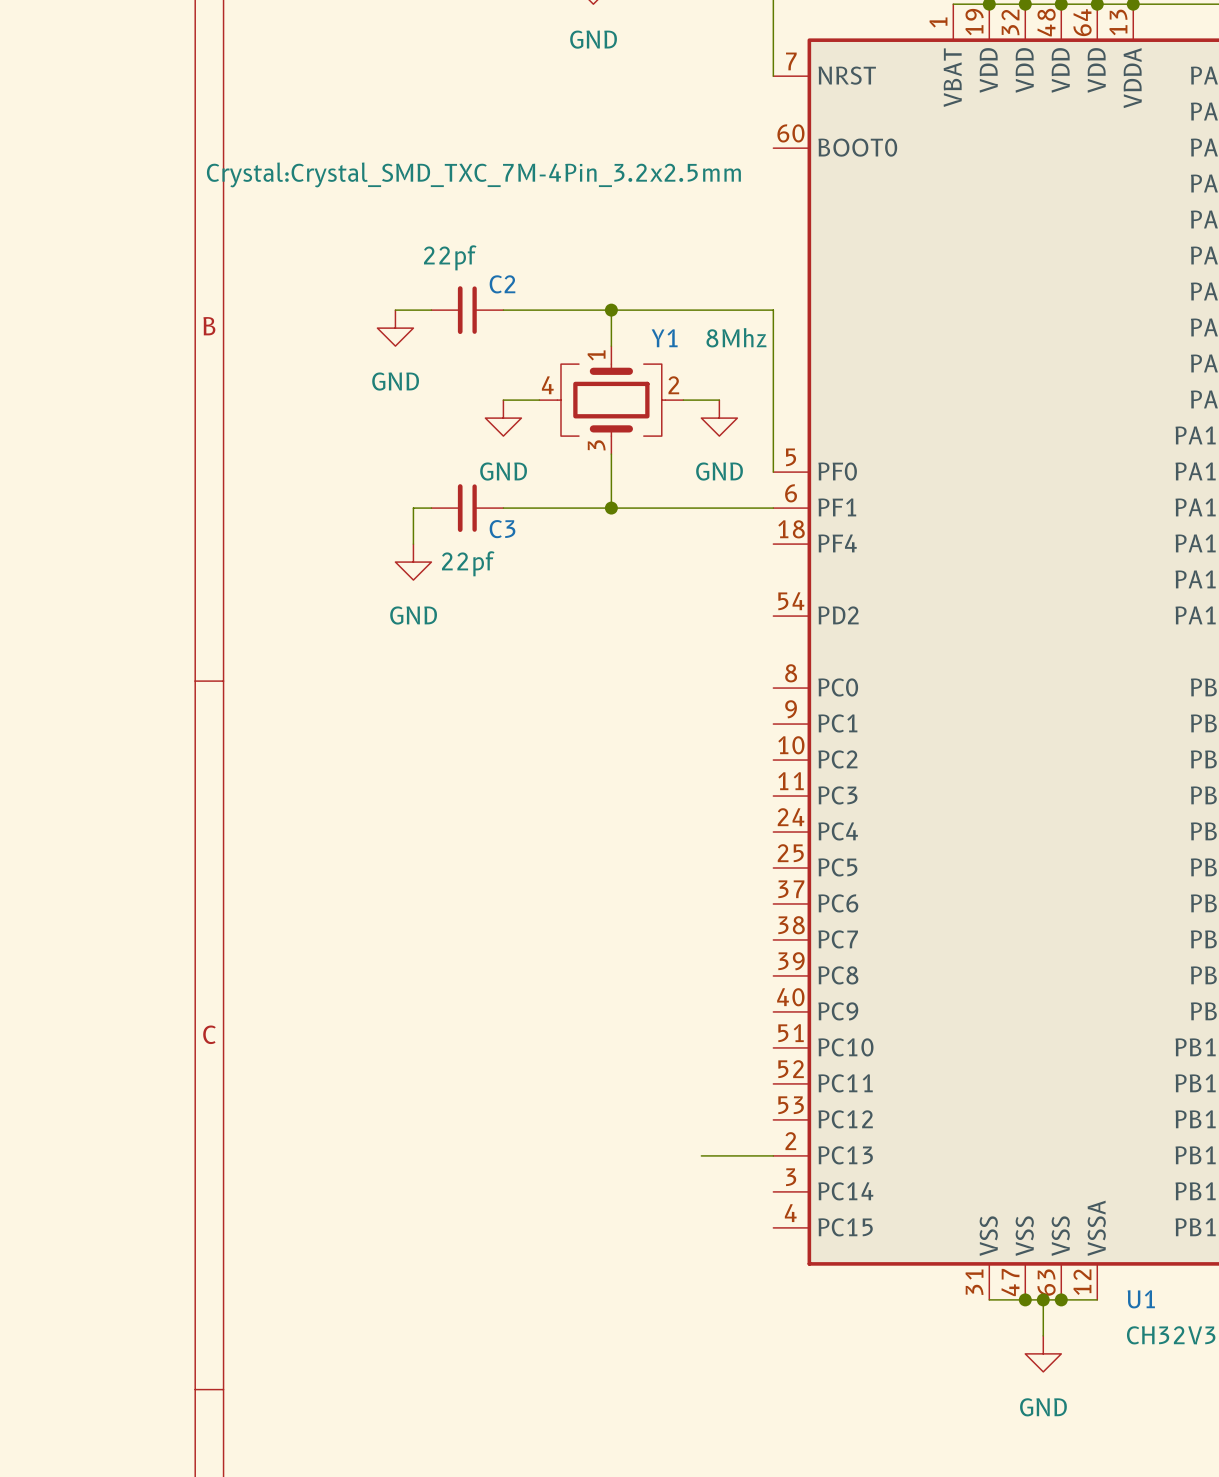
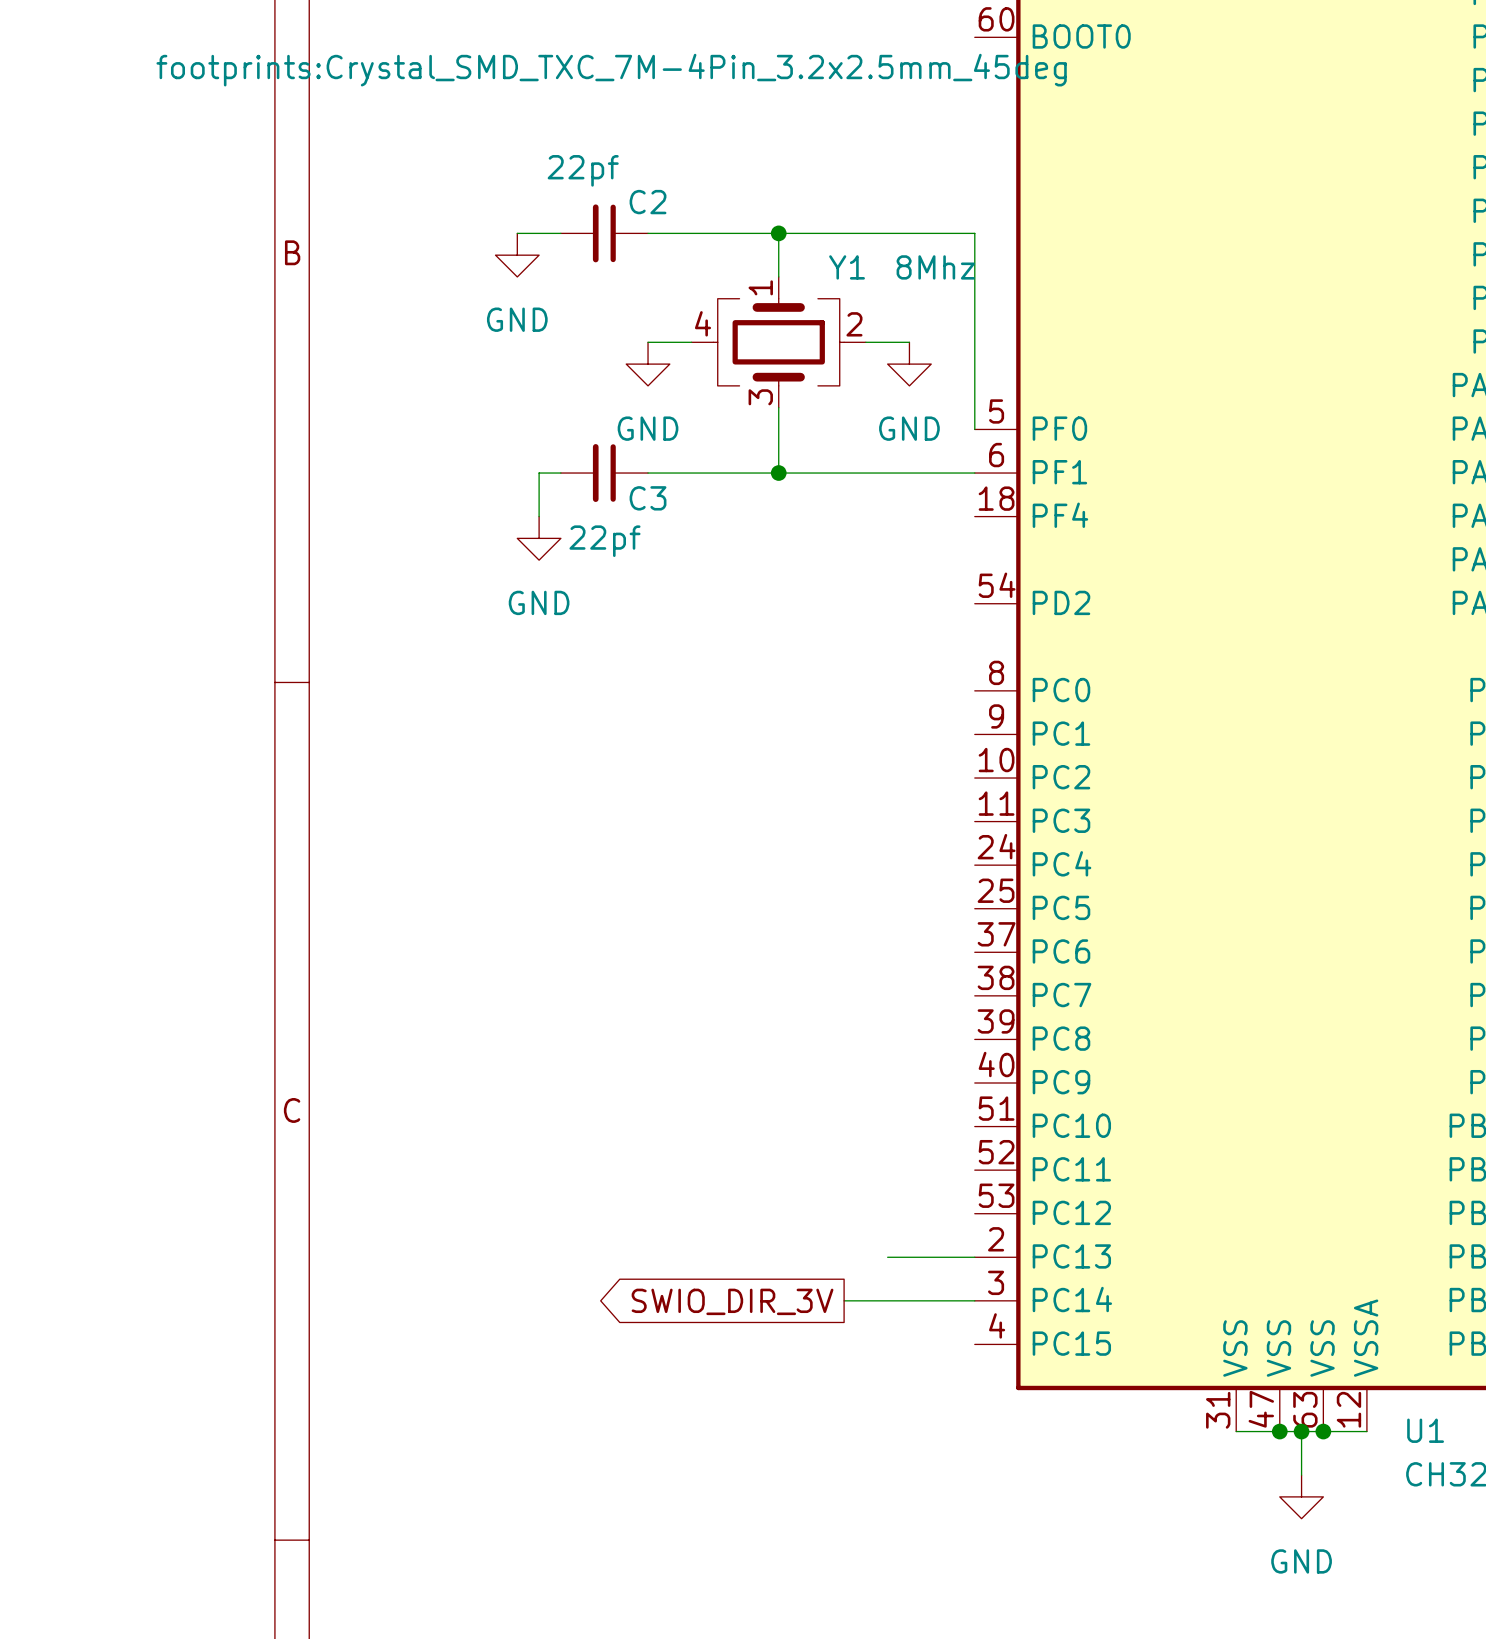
Y1 text: Crystal:Crystal_SMD_TXC_7M-4Pin_3.2x2.5mm (473, 174) -> footprints:Crystal_SMD_TXC_7M-4Pin_3.2x2.5mm_45deg (611, 70)
wire: none -> (844, 1300) (974, 1300)
global label: none -> SWIO_DIR_3V (732, 1301)

